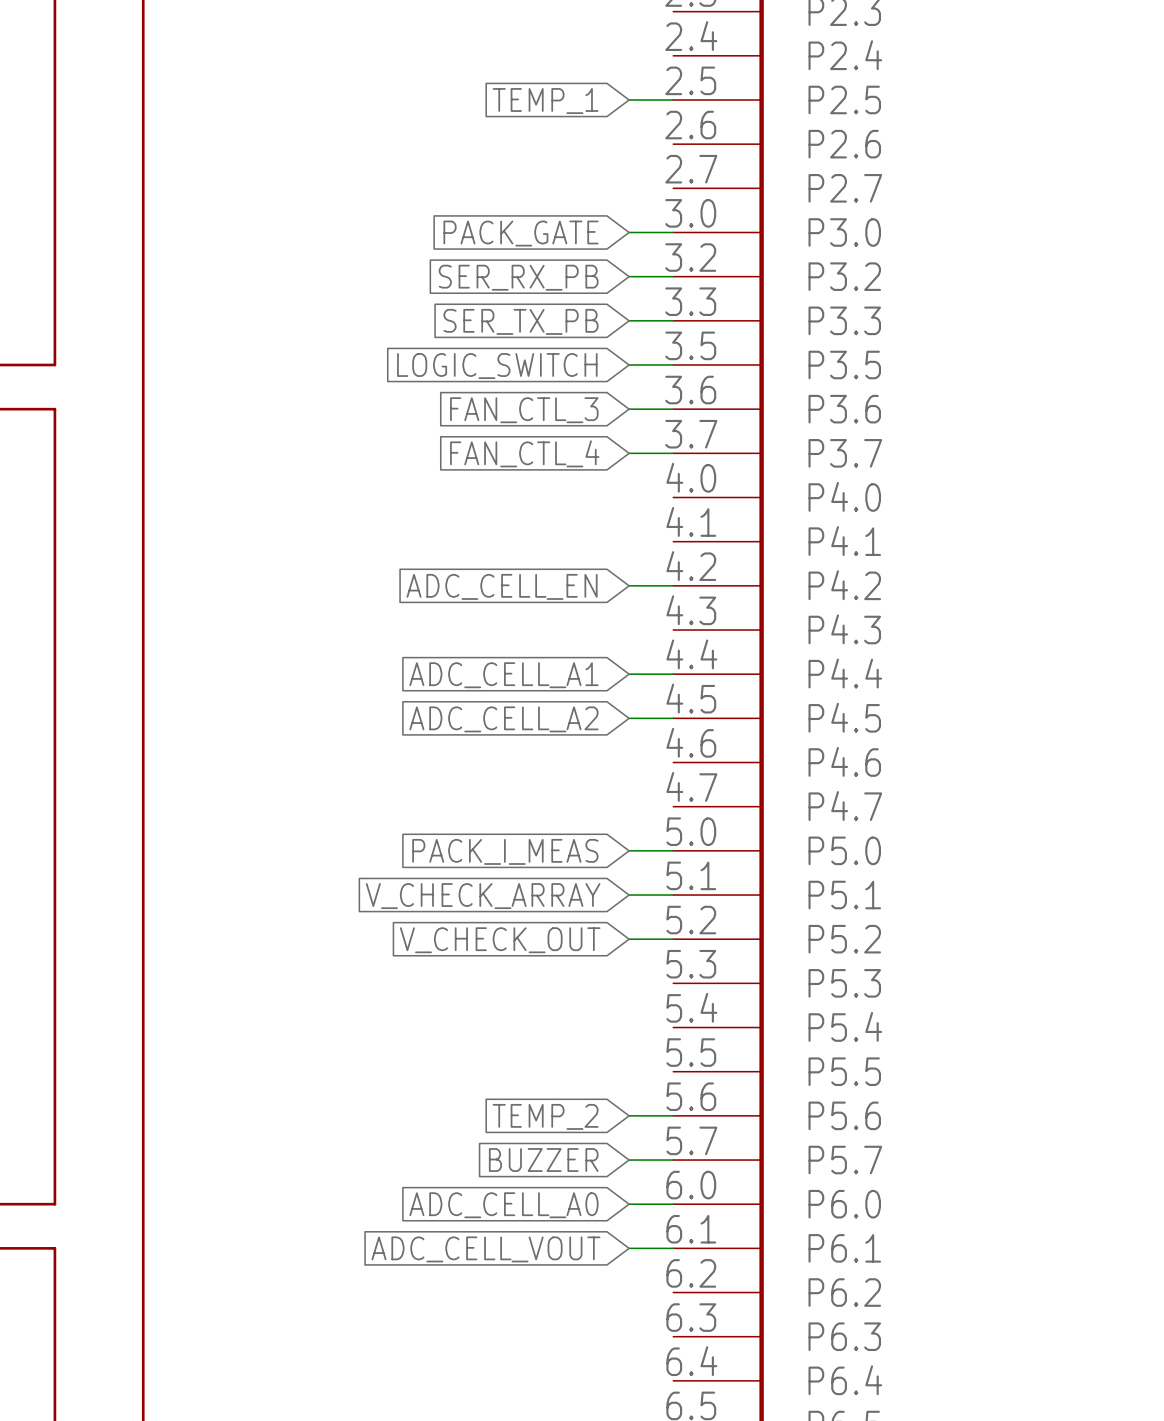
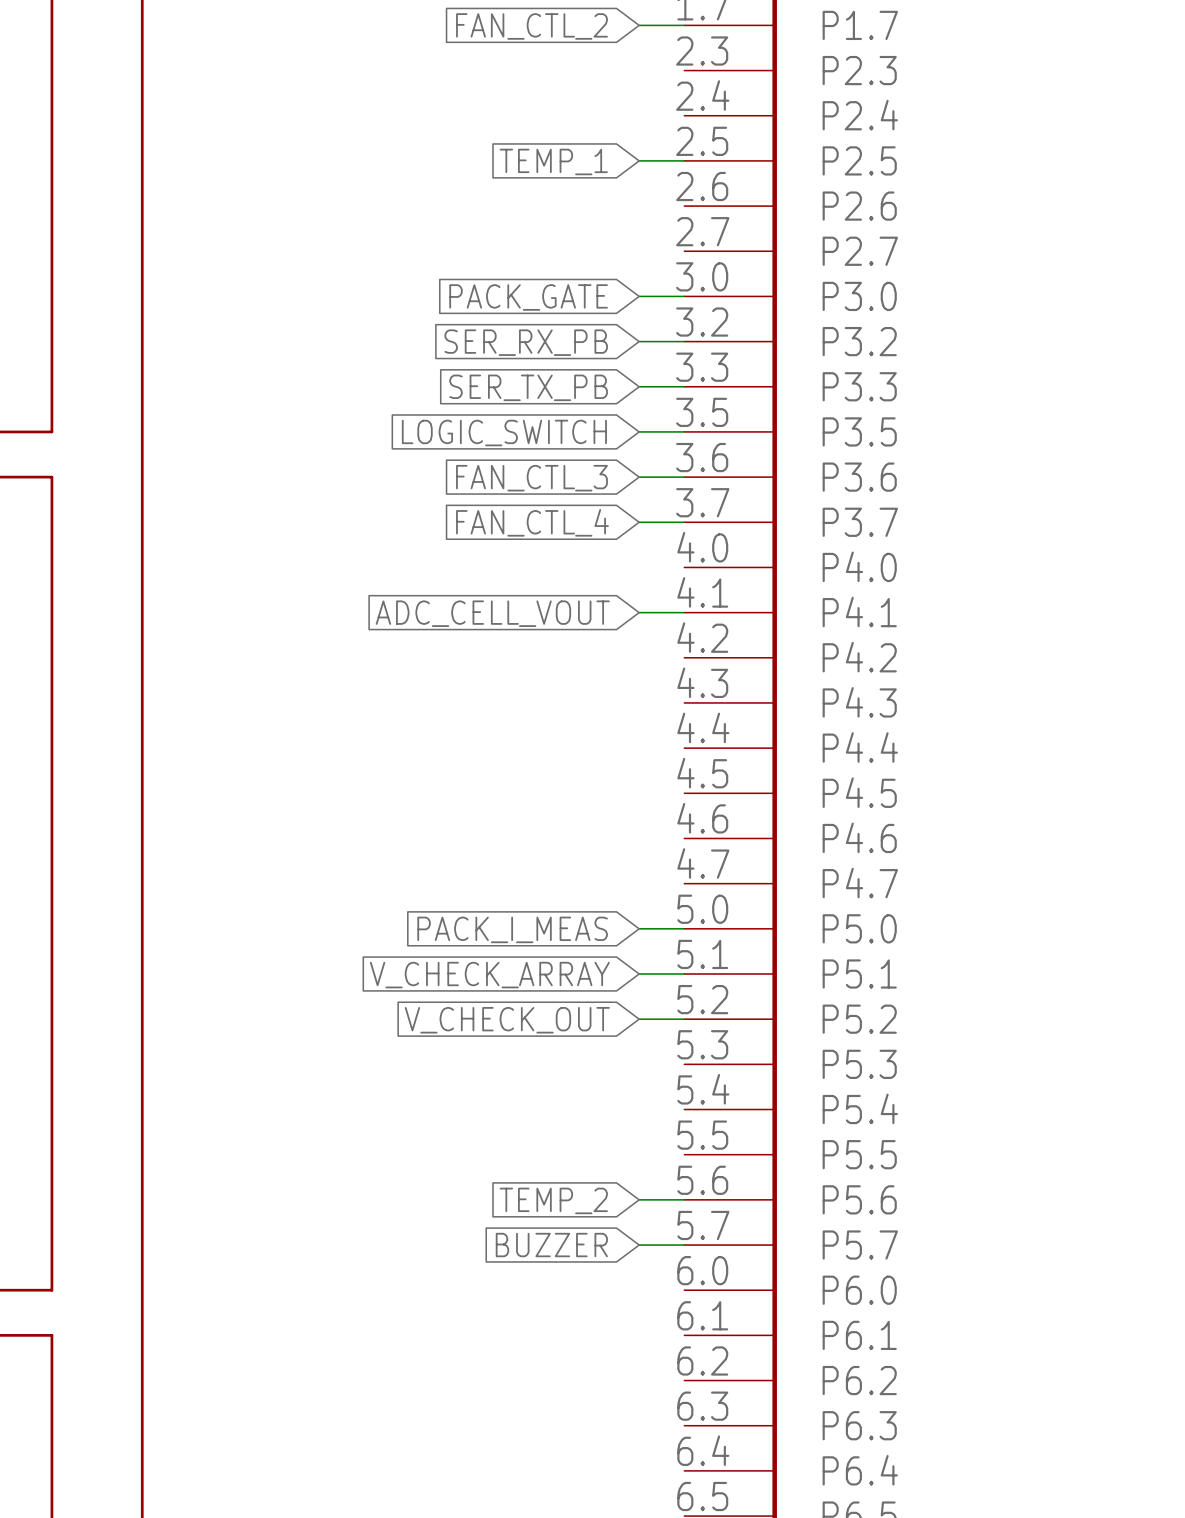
wire: (629, 585) (673, 585) -> (639, 612) (684, 612)
global label: ADC_CELL_EN (502, 586) -> ADC_CELL_VOUT (492, 613)
wire: (629, 674) (673, 674) -> none
global label: ADC_CELL_A1 (503, 675) -> none
wire: (629, 718) (673, 718) -> none
global label: ADC_CELL_A2 (503, 719) -> none
wire: (629, 1204) (673, 1204) -> none
global label: ADC_CELL_A0 (503, 1205) -> none
wire: (629, 1248) (673, 1248) -> none
global label: ADC_CELL_VOUT (485, 1249) -> none

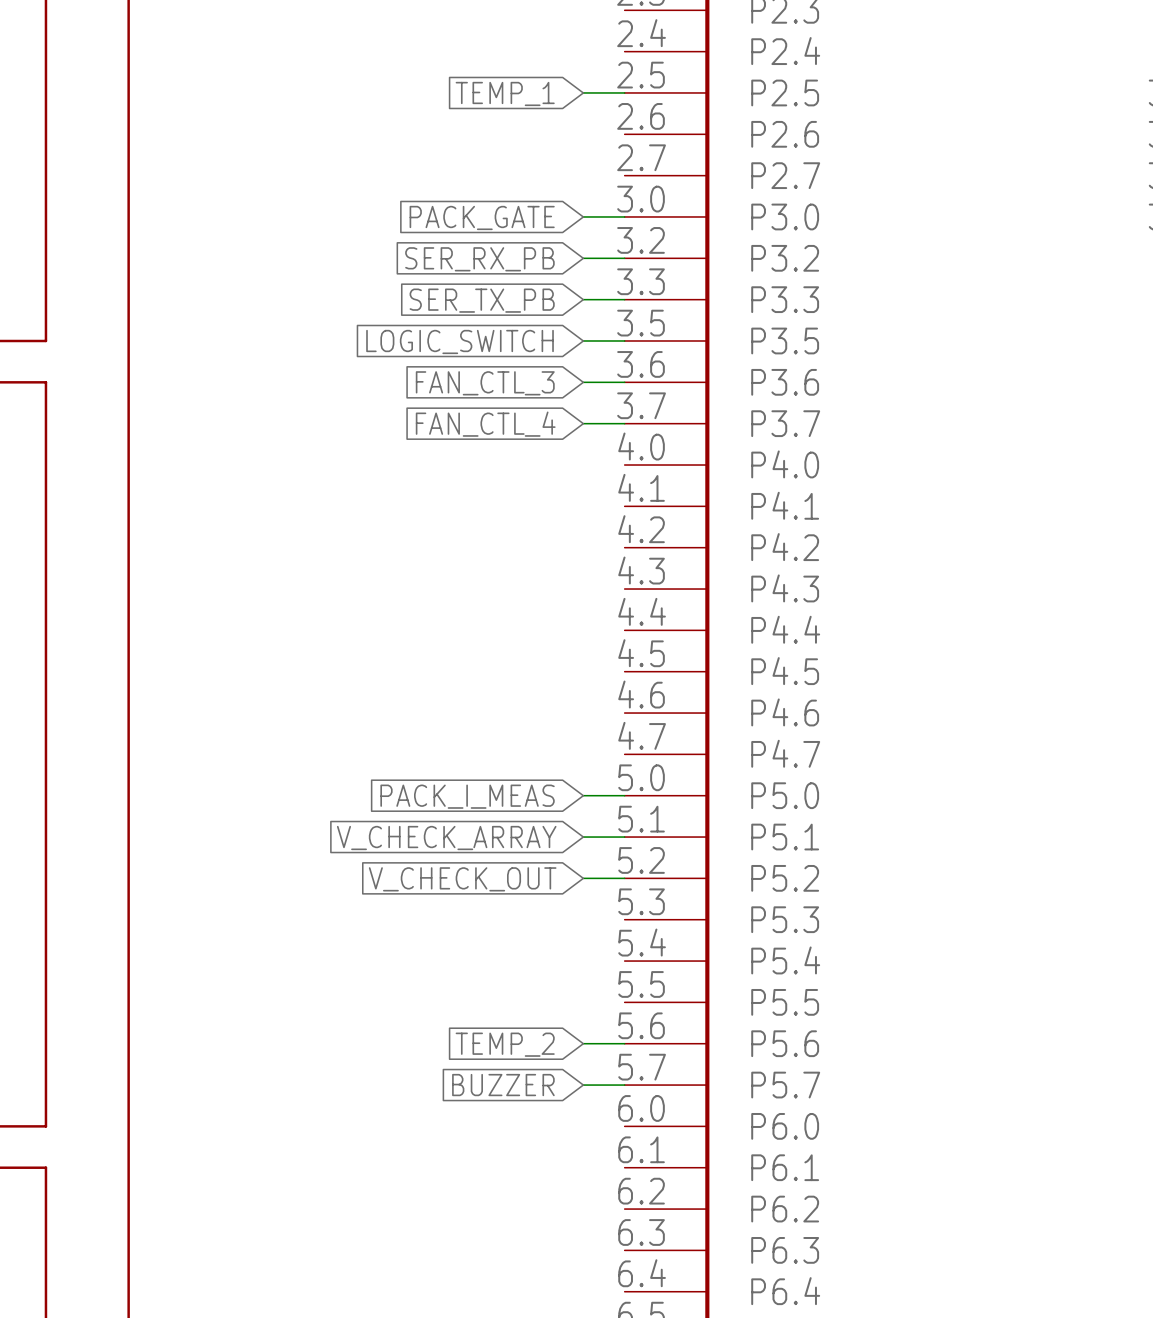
wire: (639, 612) (684, 612) -> none
global label: ADC_CELL_VOUT (492, 613) -> none

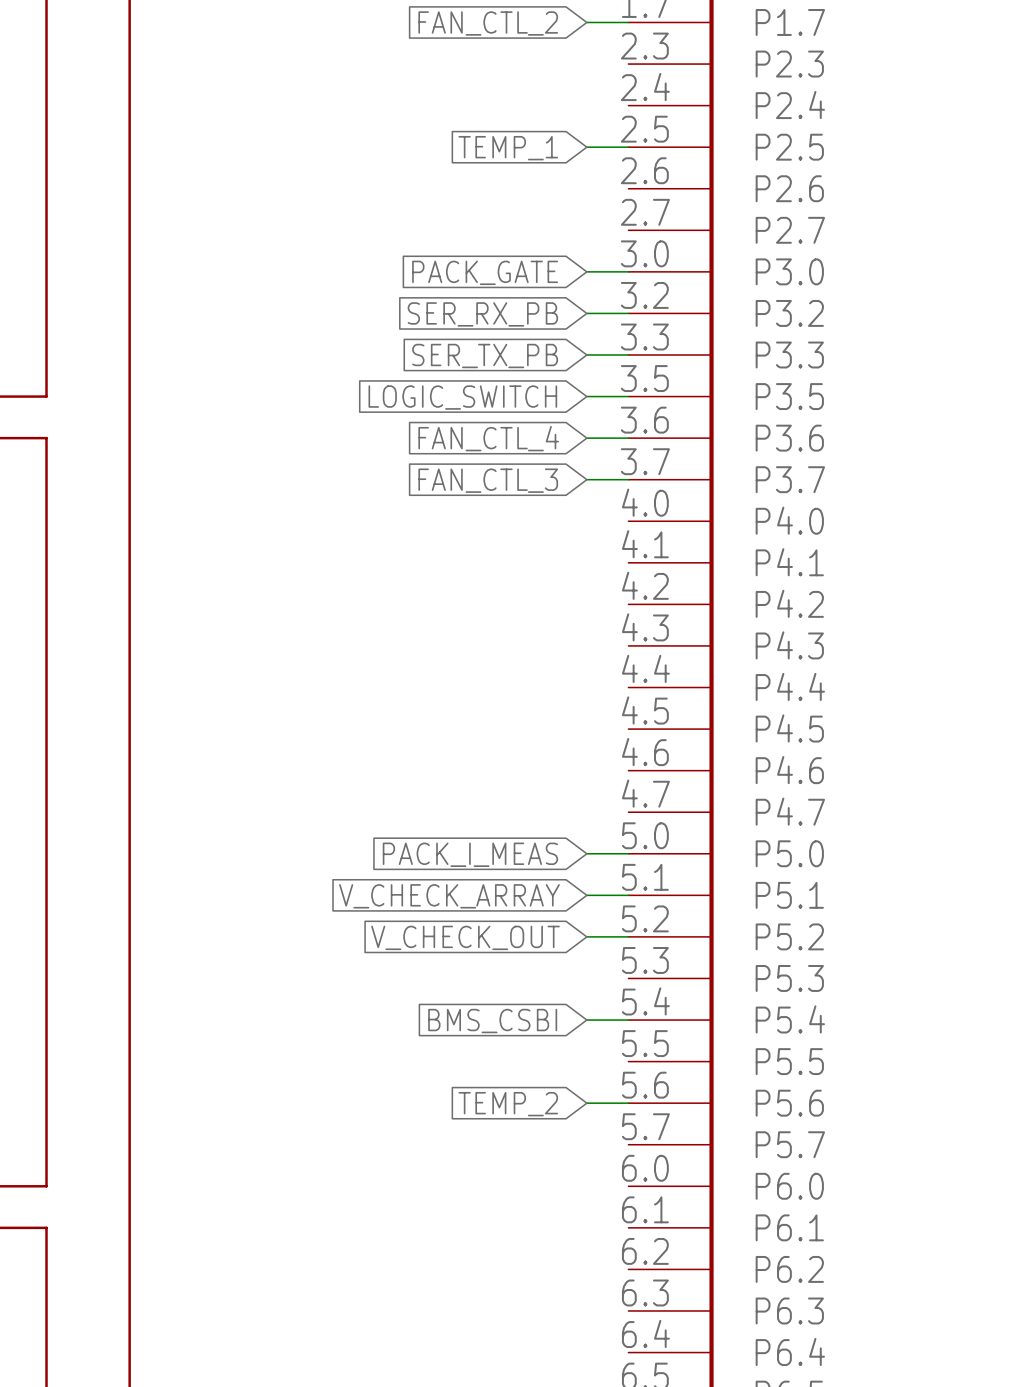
global label: FAN_CTL_3 (485, 383) -> FAN_CTL_4 (488, 438)
global label: FAN_CTL_4 (485, 424) -> FAN_CTL_3 (488, 480)
global label: none -> BMS_CSBI (492, 1021)
global label: BUZZER (503, 1085) -> none
wire: (583, 1085) (624, 1085) -> (586, 1020) (628, 1020)

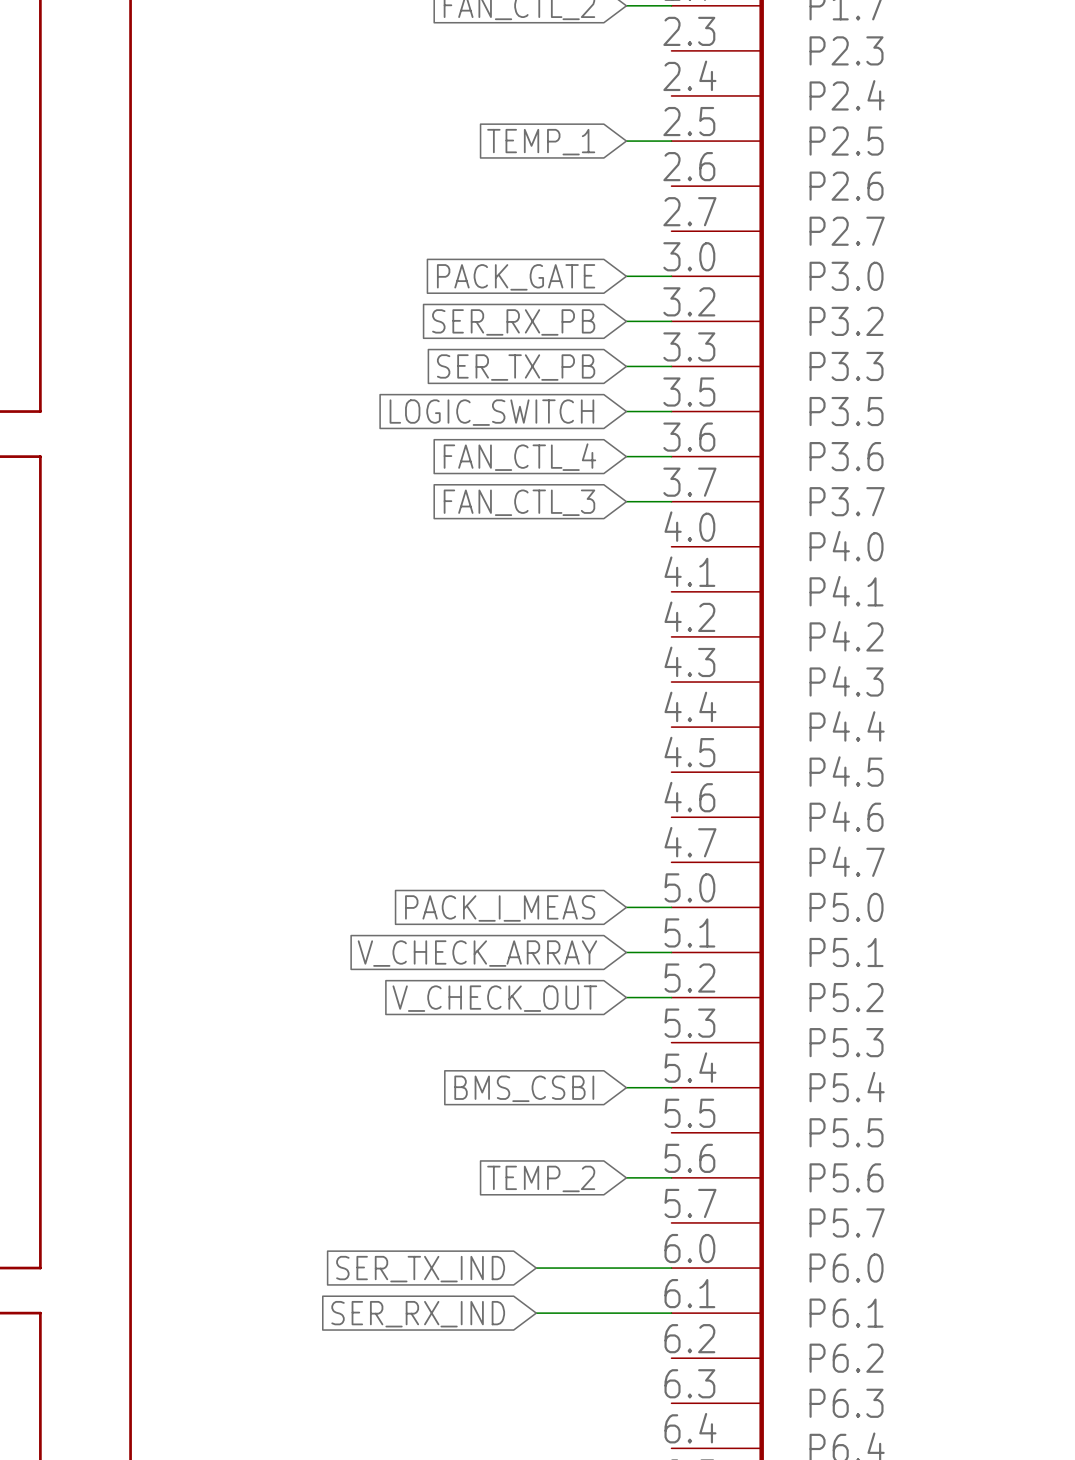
wire: none -> (536, 1268) (671, 1268)
global label: none -> SER_TX_IND (420, 1269)
wire: none -> (536, 1313) (671, 1313)
global label: none -> SER_RX_IND (418, 1314)

